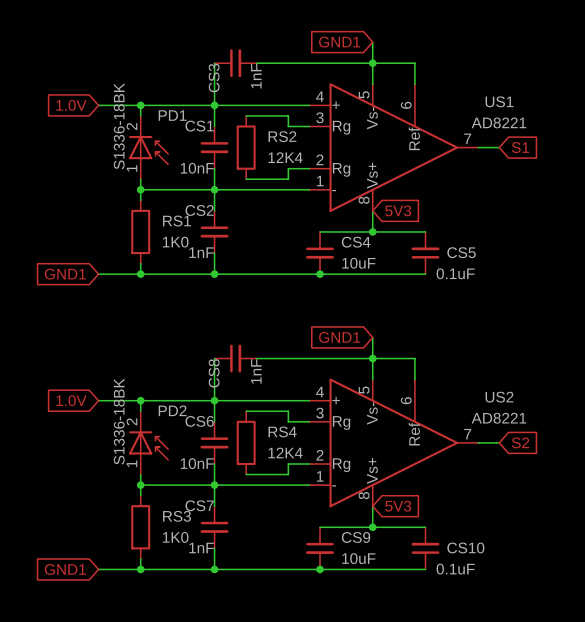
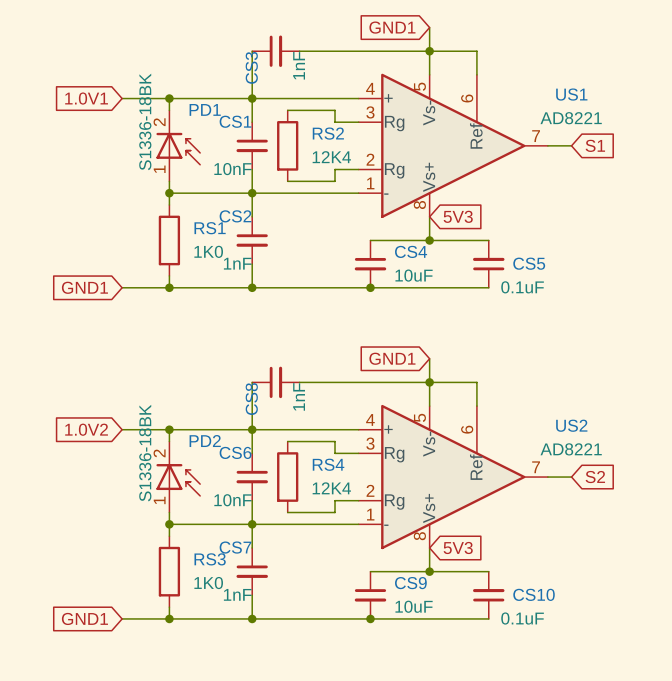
global label: 1.0V (71, 105) -> 1.0V1 (86, 98)
global label: 1.0V (71, 400) -> 1.0V2 (86, 429)

